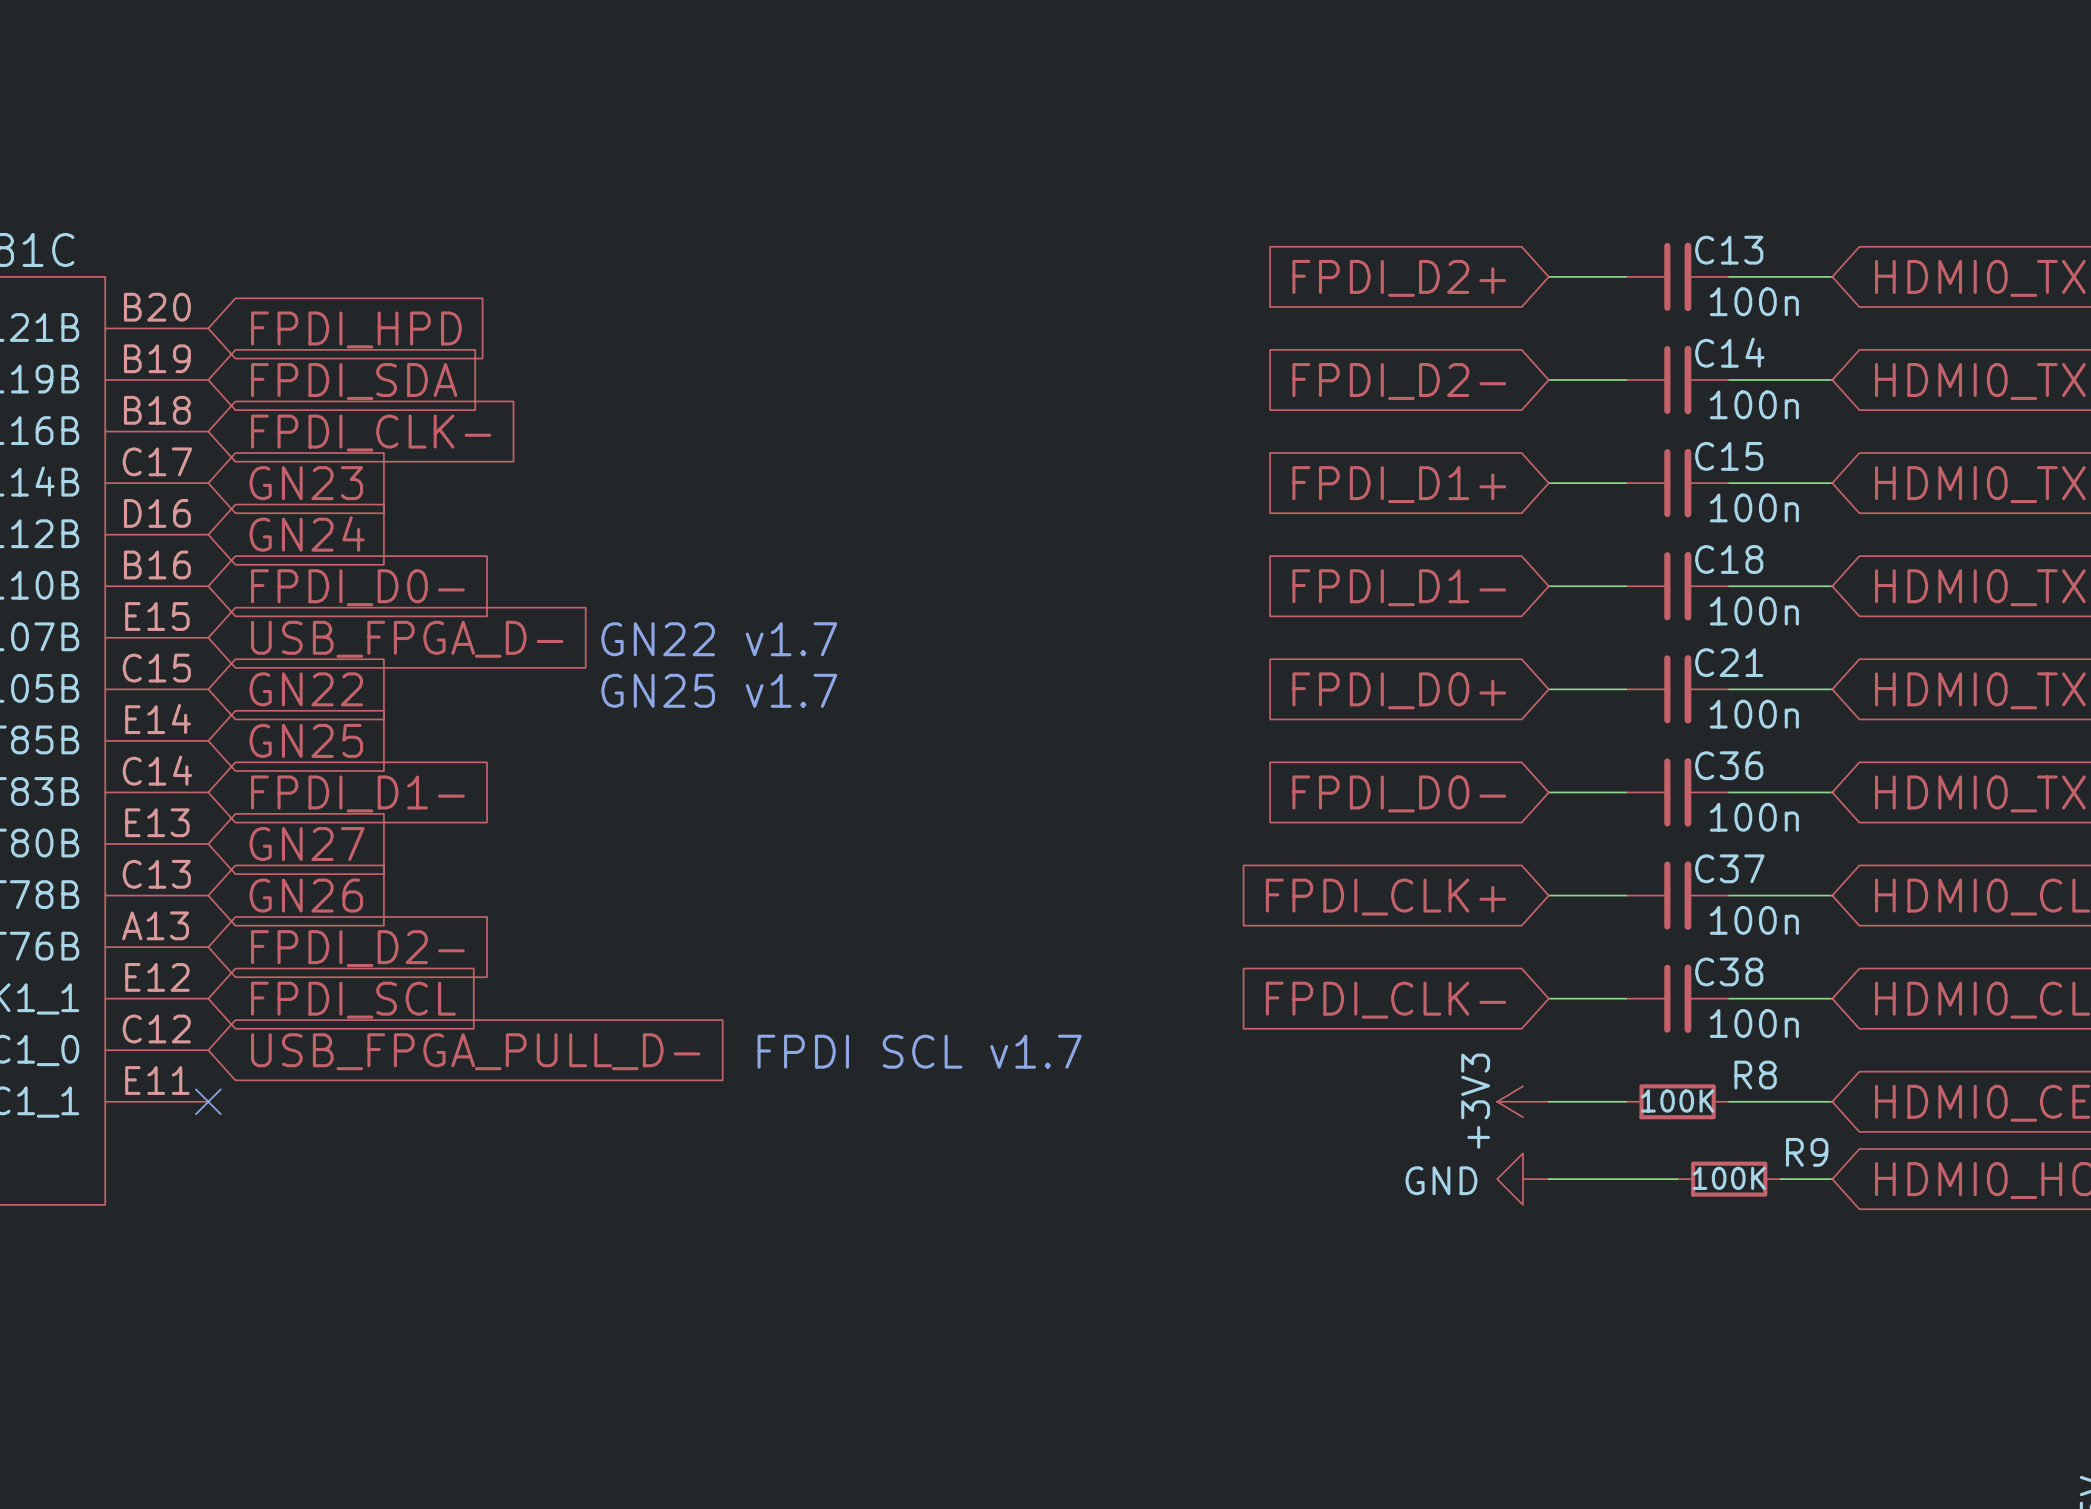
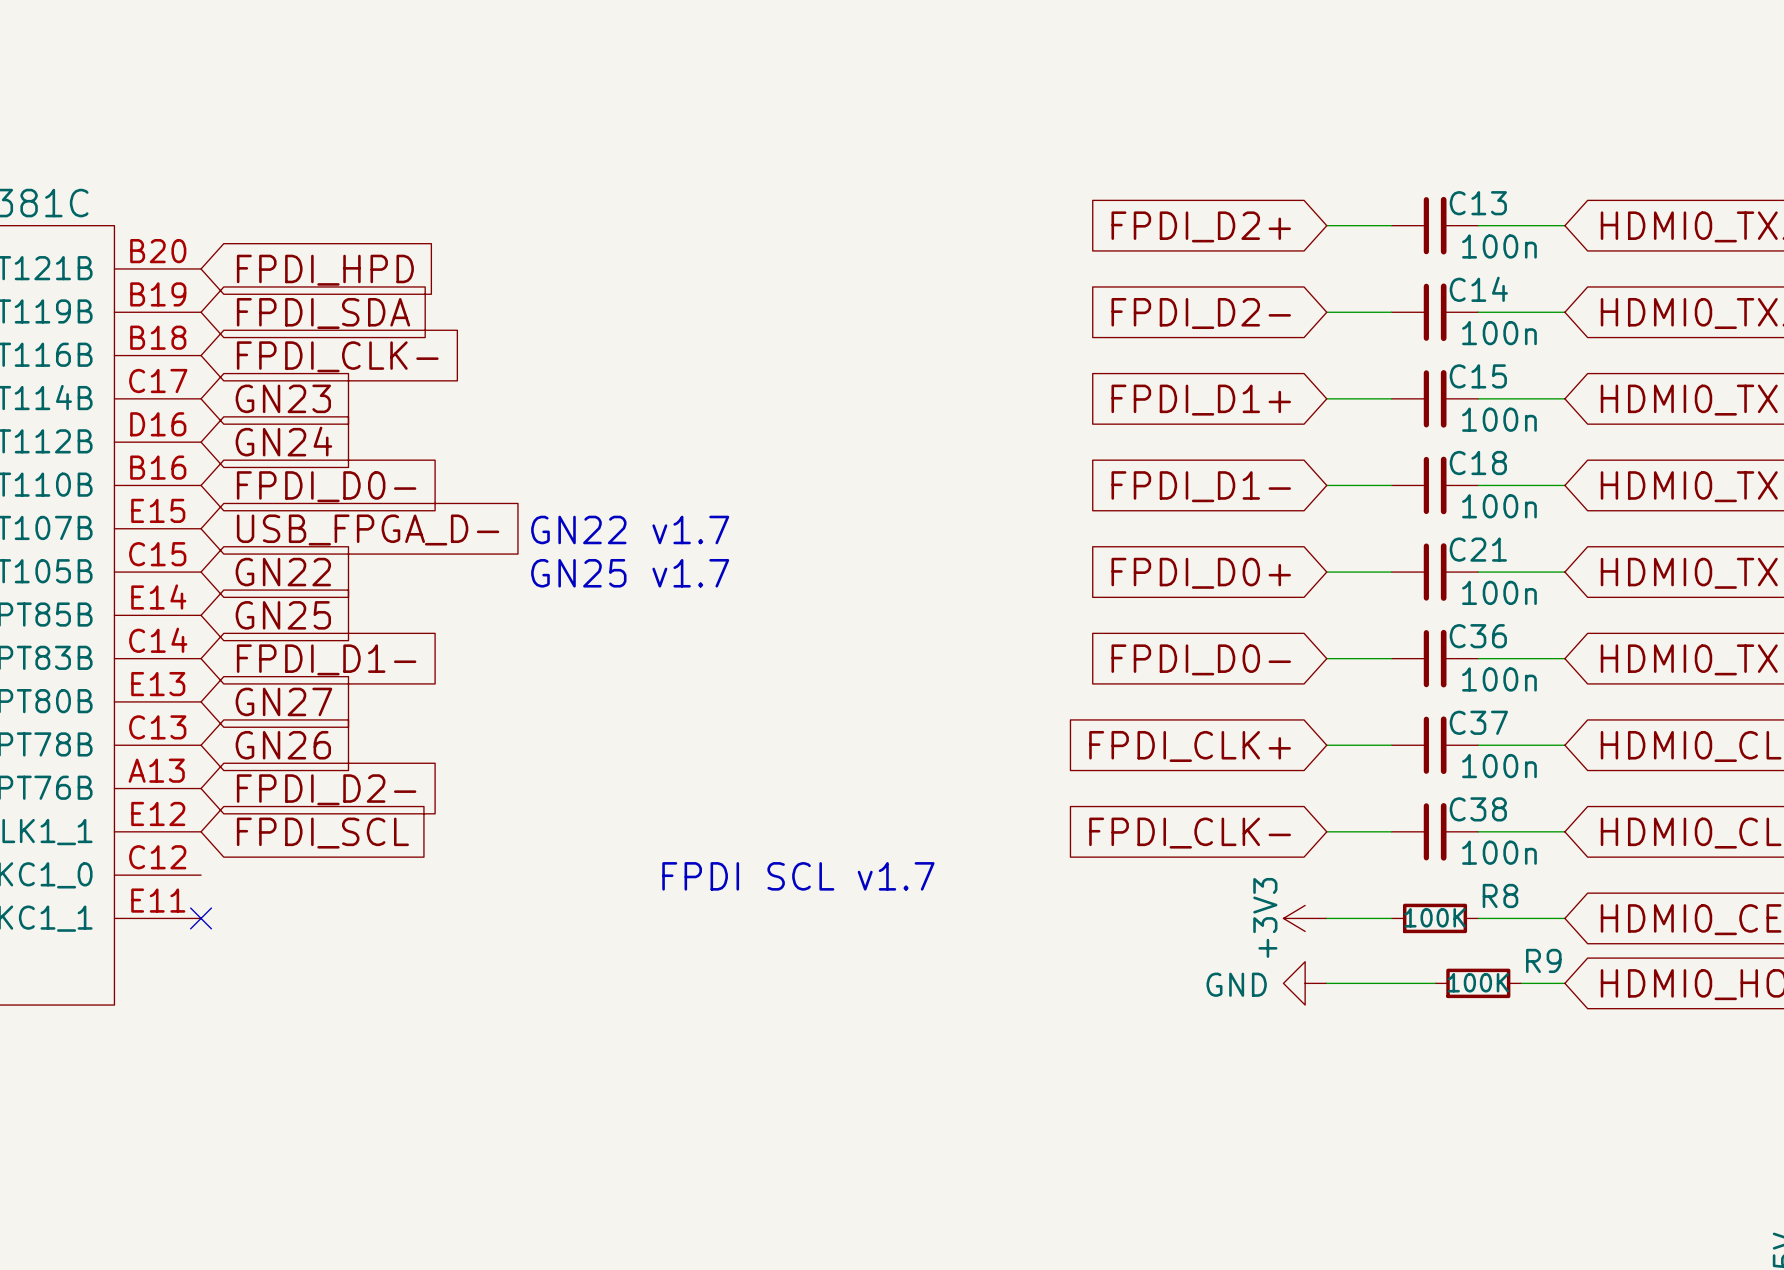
global label: USB_FPGA_PULL_D- (475, 1051) -> none

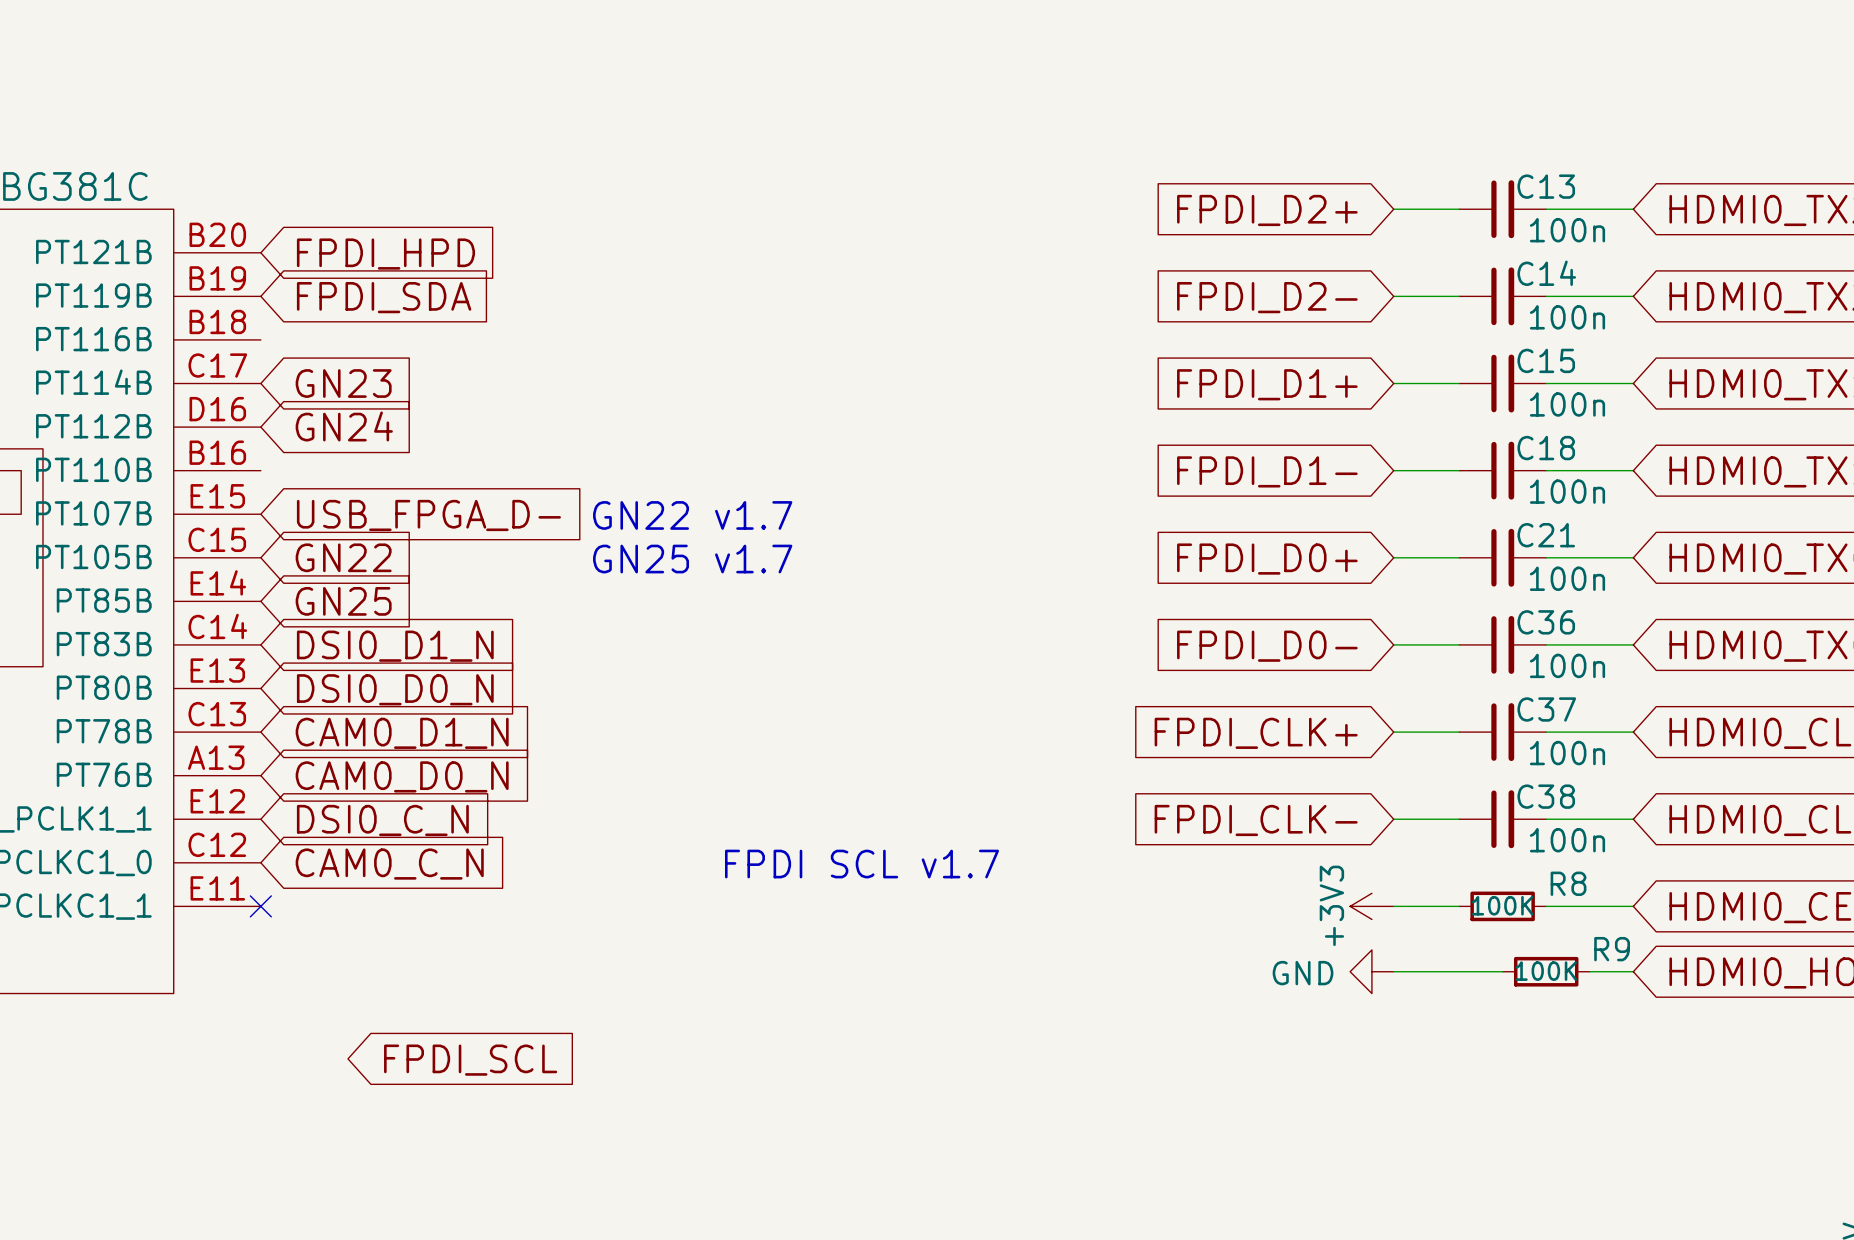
global label: FPDI_CLK- (337, 356) -> none
global label: FPDI_D0- (326, 486) -> none
global label: FPDI_D1- (326, 659) -> DSI0_D1_N (395, 646)
global label: GN27 (283, 701) -> DSI0_D0_N (395, 689)
global label: GN26 (283, 745) -> CAM0_D1_N (402, 733)
global label: FPDI_D2- (326, 789) -> CAM0_D0_N (402, 776)
global label: FPDI_SCL (322, 833) -> DSI0_C_N (382, 820)
global label: none -> CAM0_C_N (389, 864)
global label: none -> FPDI_SCL (470, 1060)

